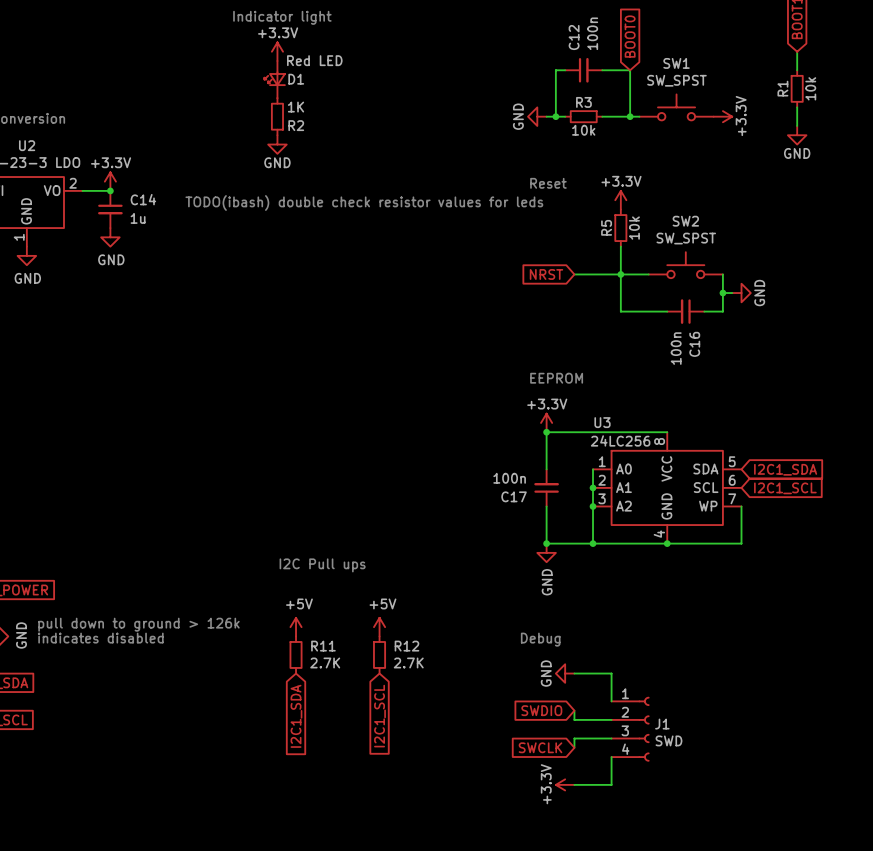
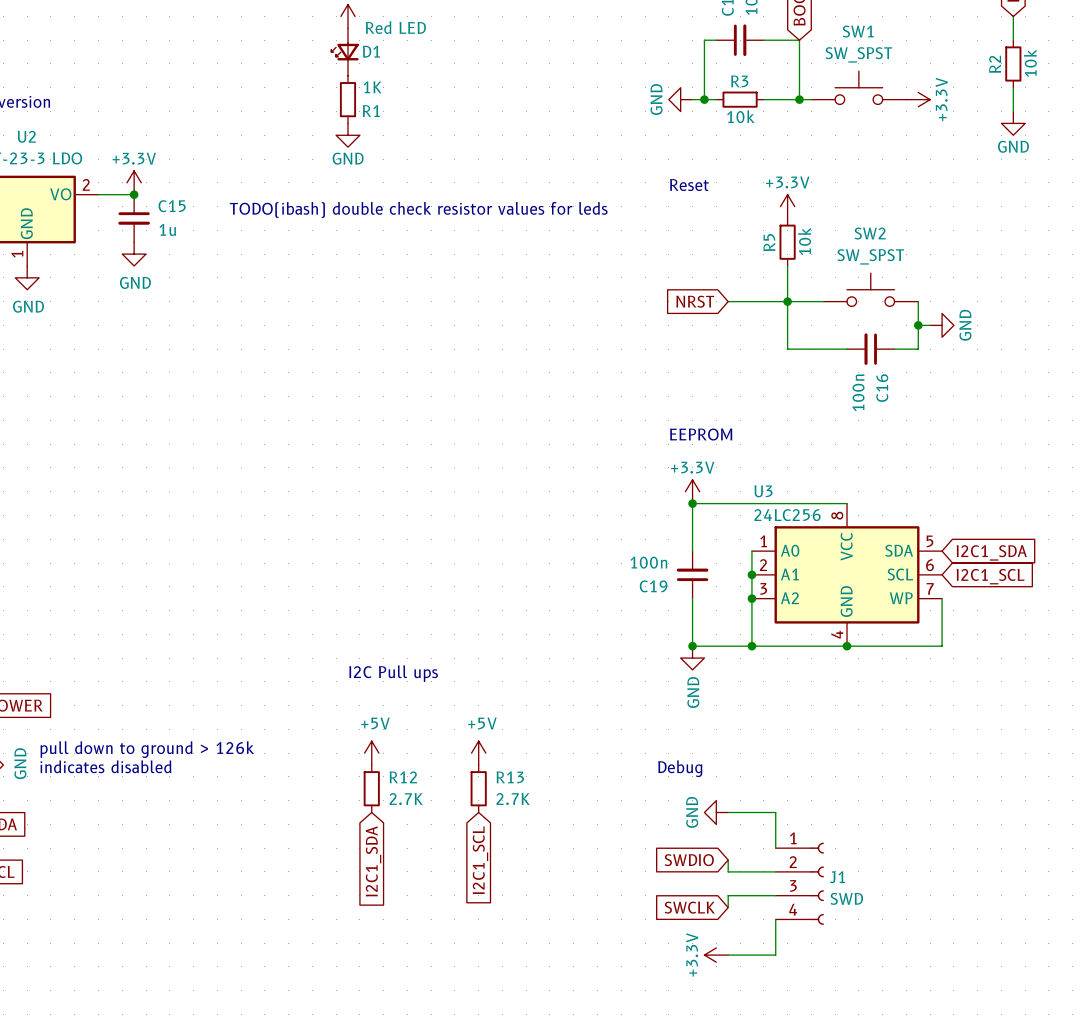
R1 name: R1 (782, 88) -> R2 (995, 64)
R2 name: R2 (296, 125) -> R1 (371, 111)
C14 name: C14 (143, 199) -> C15 (172, 206)
C17 name: C17 (514, 496) -> C19 (653, 586)
R11 name: R11 (323, 646) -> R12 (403, 777)
R12 name: R12 (406, 646) -> R13 (510, 777)

